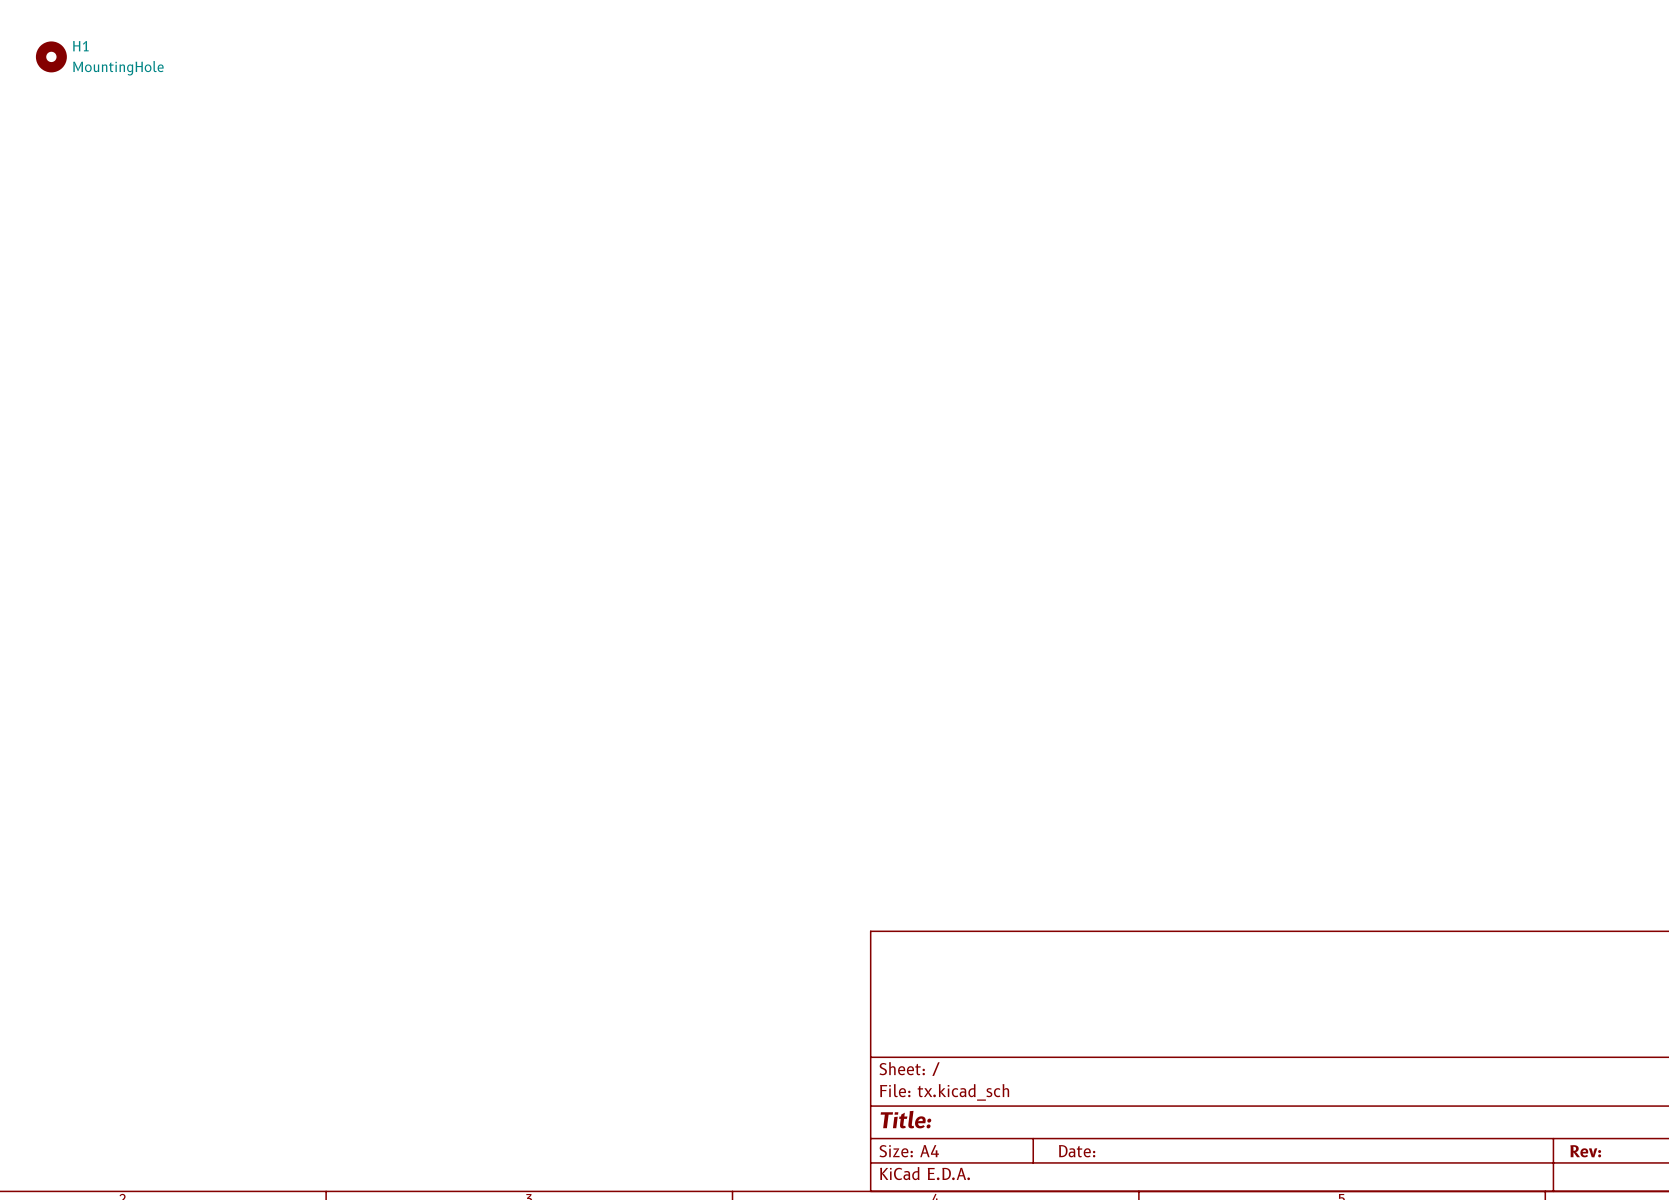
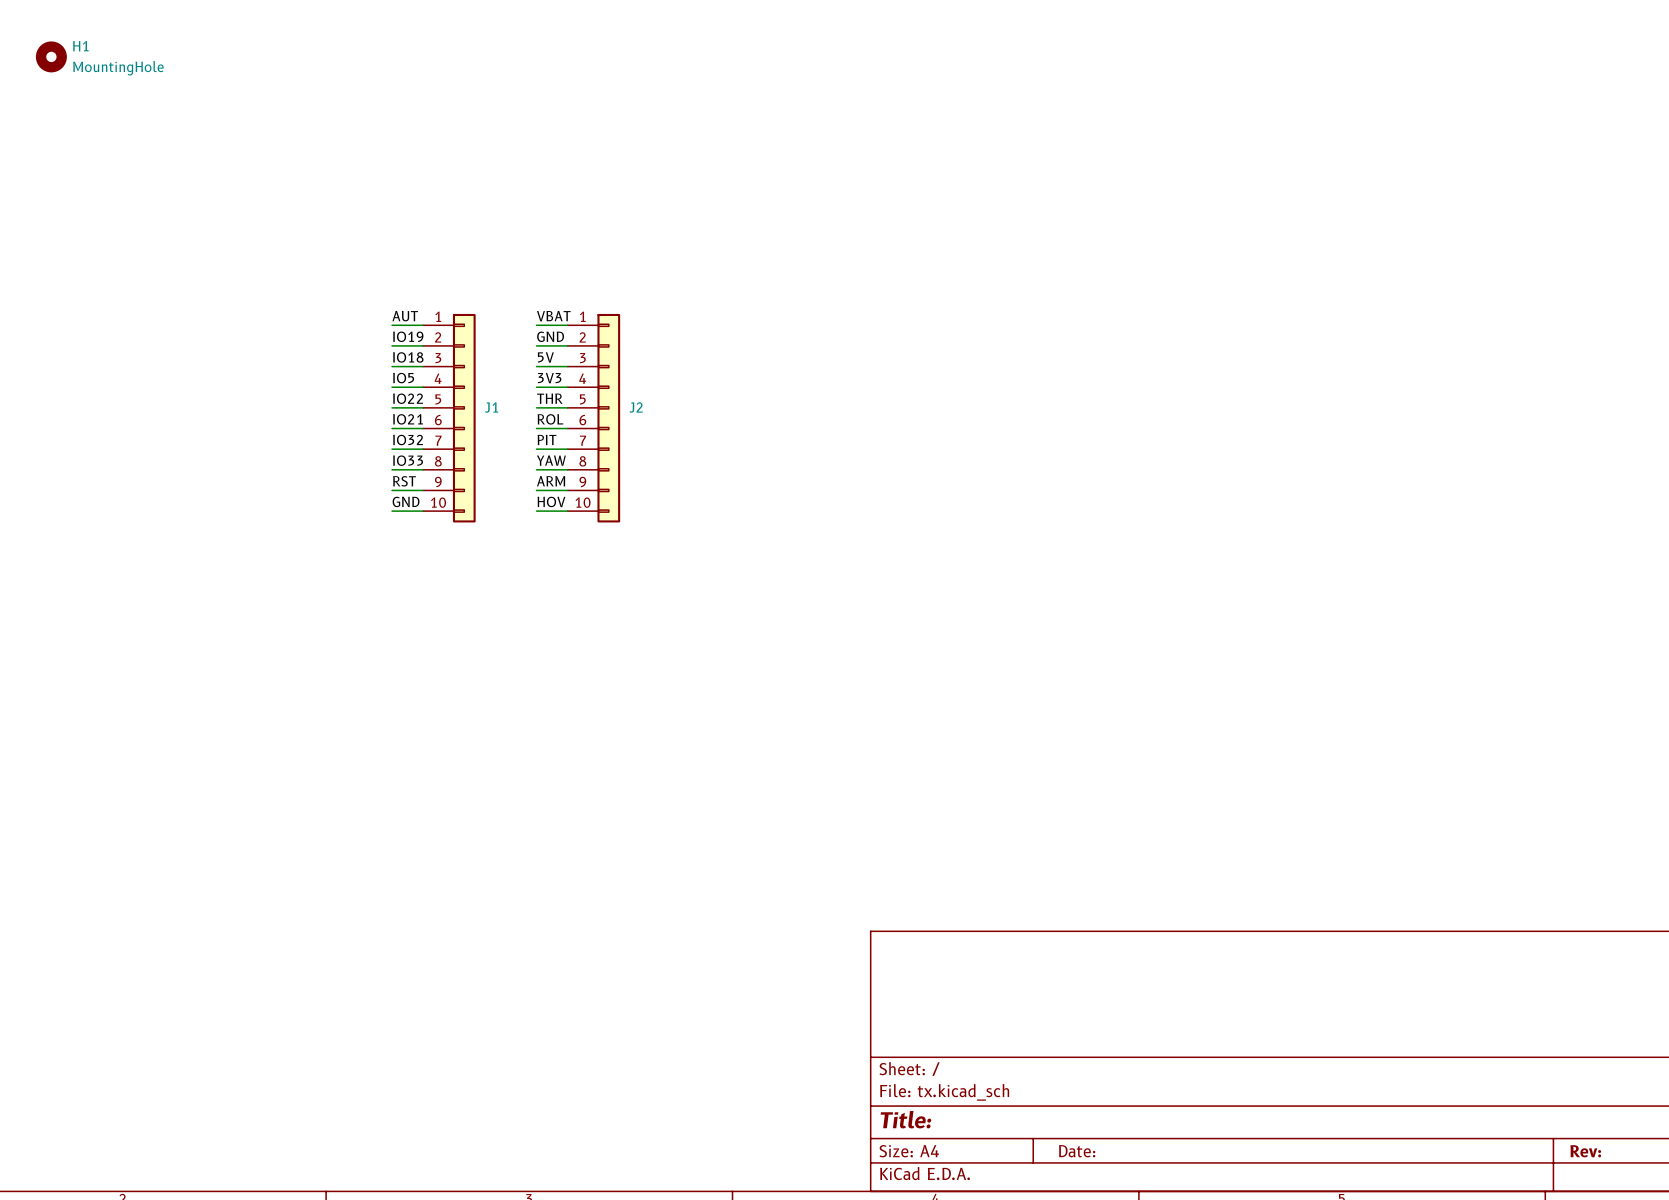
label: none -> AUT (405, 316)
label: none -> VBAT (553, 316)
wire: none -> (392, 325) (422, 325)
wire: none -> (536, 325) (567, 325)
label: none -> IO19 (408, 336)
label: none -> GND (550, 336)
wire: none -> (392, 345) (422, 345)
wire: none -> (536, 345) (567, 345)
label: none -> IO18 (408, 357)
label: none -> 5V (545, 357)
wire: none -> (392, 366) (422, 366)
wire: none -> (536, 366) (567, 366)
label: none -> IO5 (403, 378)
label: none -> 3V3 (549, 378)
wire: none -> (392, 387) (422, 387)
wire: none -> (536, 387) (567, 387)
label: none -> IO22 (408, 398)
label: none -> THR (549, 398)
wire: none -> (392, 407) (422, 407)
wire: none -> (536, 407) (567, 407)
J1: none -> (449, 418)
J2: none -> (593, 418)
label: none -> IO21 (408, 419)
label: none -> ROL (550, 419)
wire: none -> (392, 428) (422, 428)
wire: none -> (536, 428) (567, 428)
label: none -> PIT (546, 439)
label: none -> IO32 (408, 440)
wire: none -> (392, 449) (422, 449)
wire: none -> (536, 449) (567, 449)
label: none -> IO33 (408, 460)
label: none -> YAW (551, 460)
wire: none -> (392, 469) (422, 469)
wire: none -> (536, 469) (567, 469)
label: none -> RST (404, 481)
label: none -> ARM (551, 481)
wire: none -> (392, 490) (422, 490)
wire: none -> (536, 490) (567, 490)
label: none -> GND (406, 501)
label: none -> HOV (551, 501)
wire: none -> (392, 511) (422, 511)
wire: none -> (536, 511) (567, 511)

